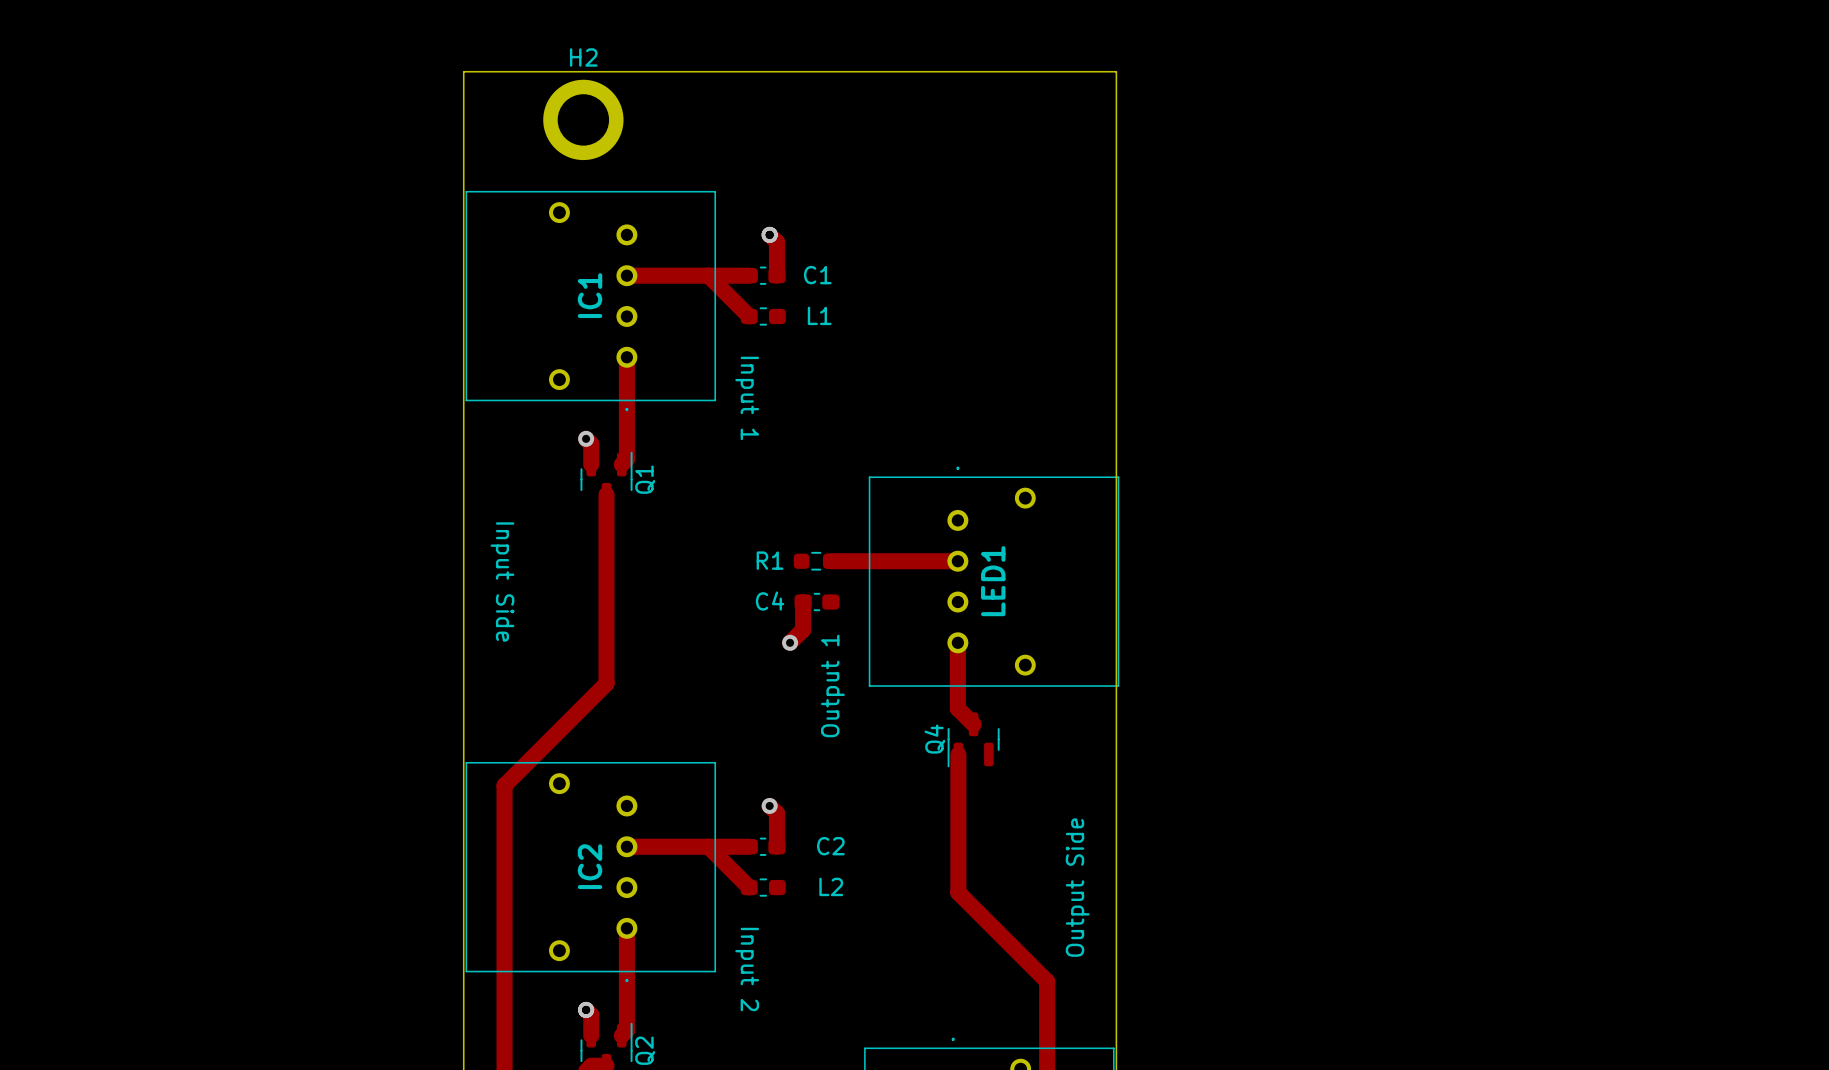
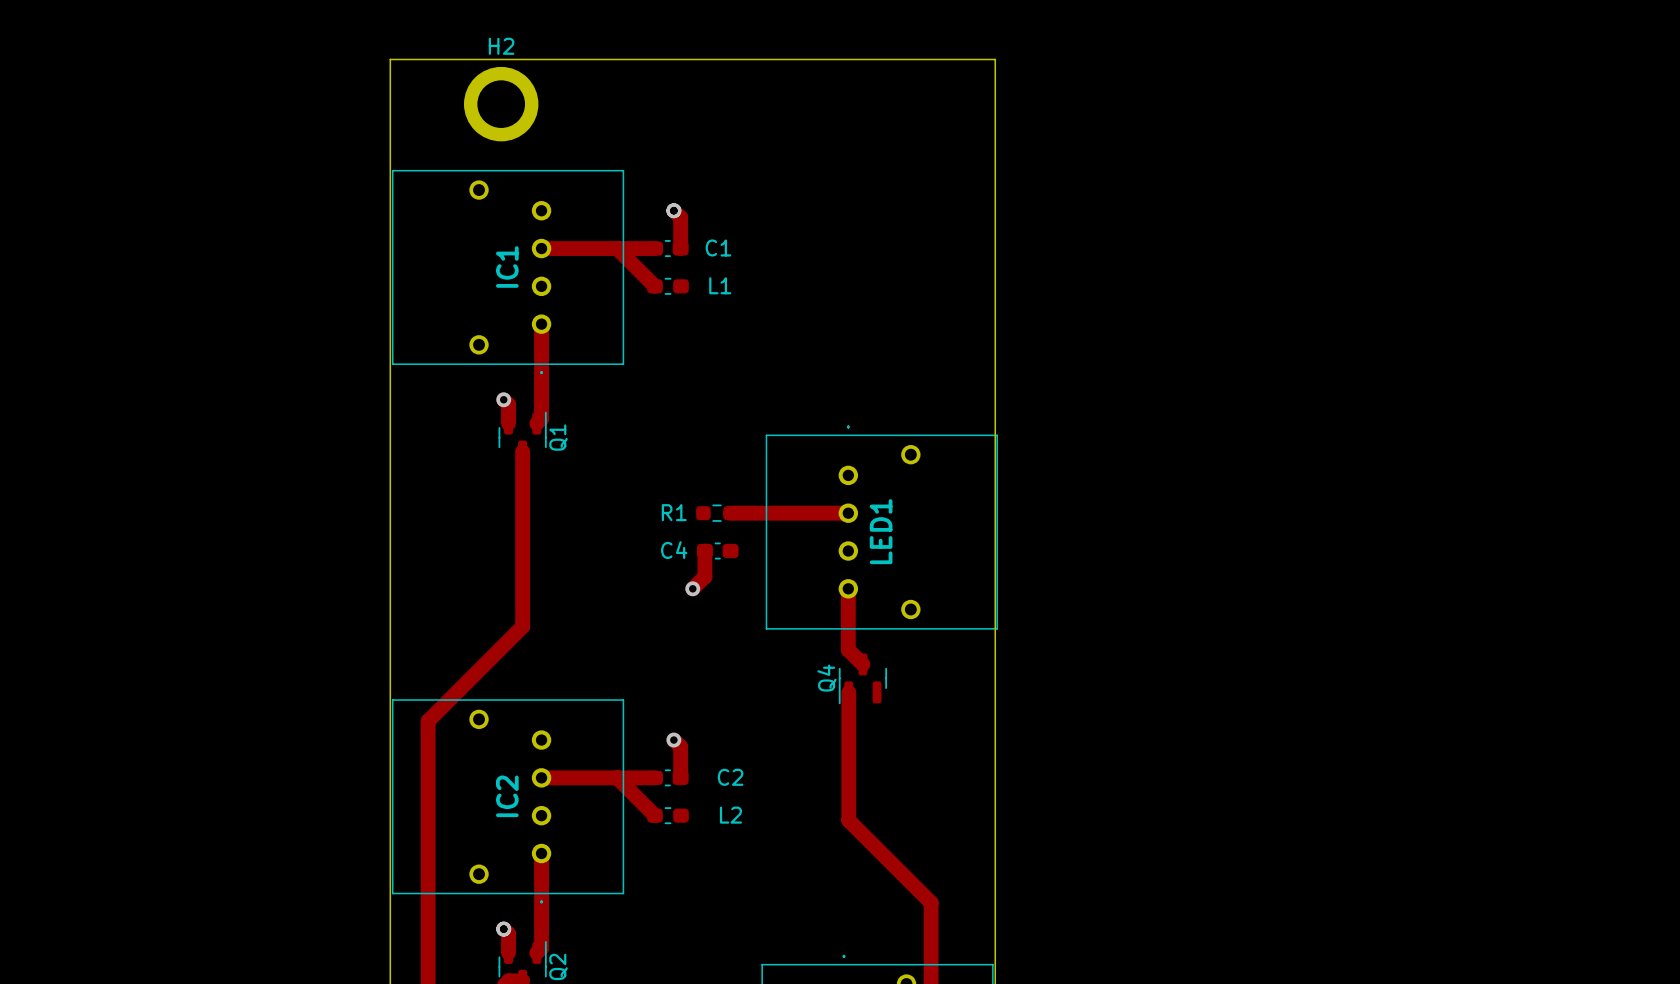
text: Input 1 (747, 398) -> none
text: Input Side (502, 582) -> none
text: Output 1 (832, 686) -> none
text: Output Side (1077, 887) -> none
text: Input 2 (747, 969) -> none

